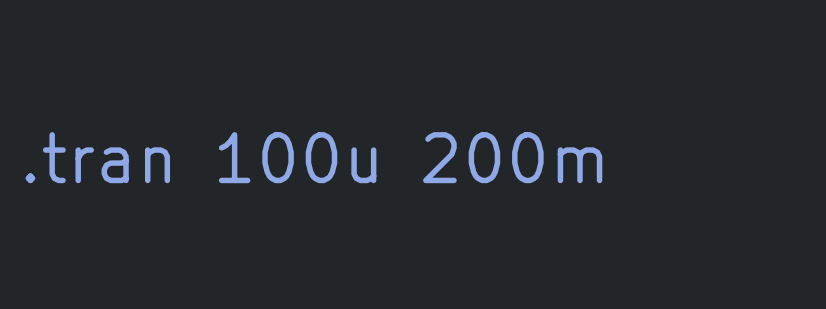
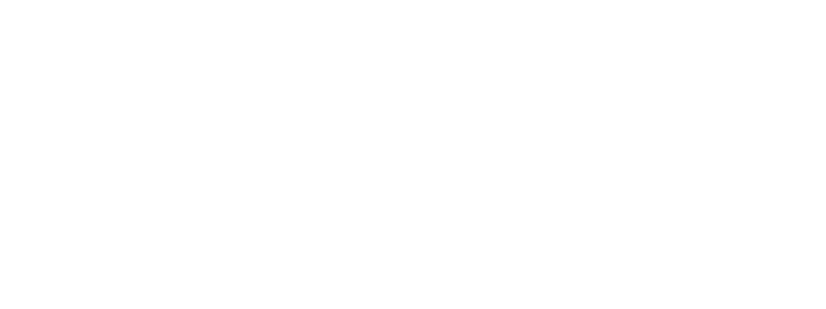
text: .tran 100u 200m (313, 157) -> none

